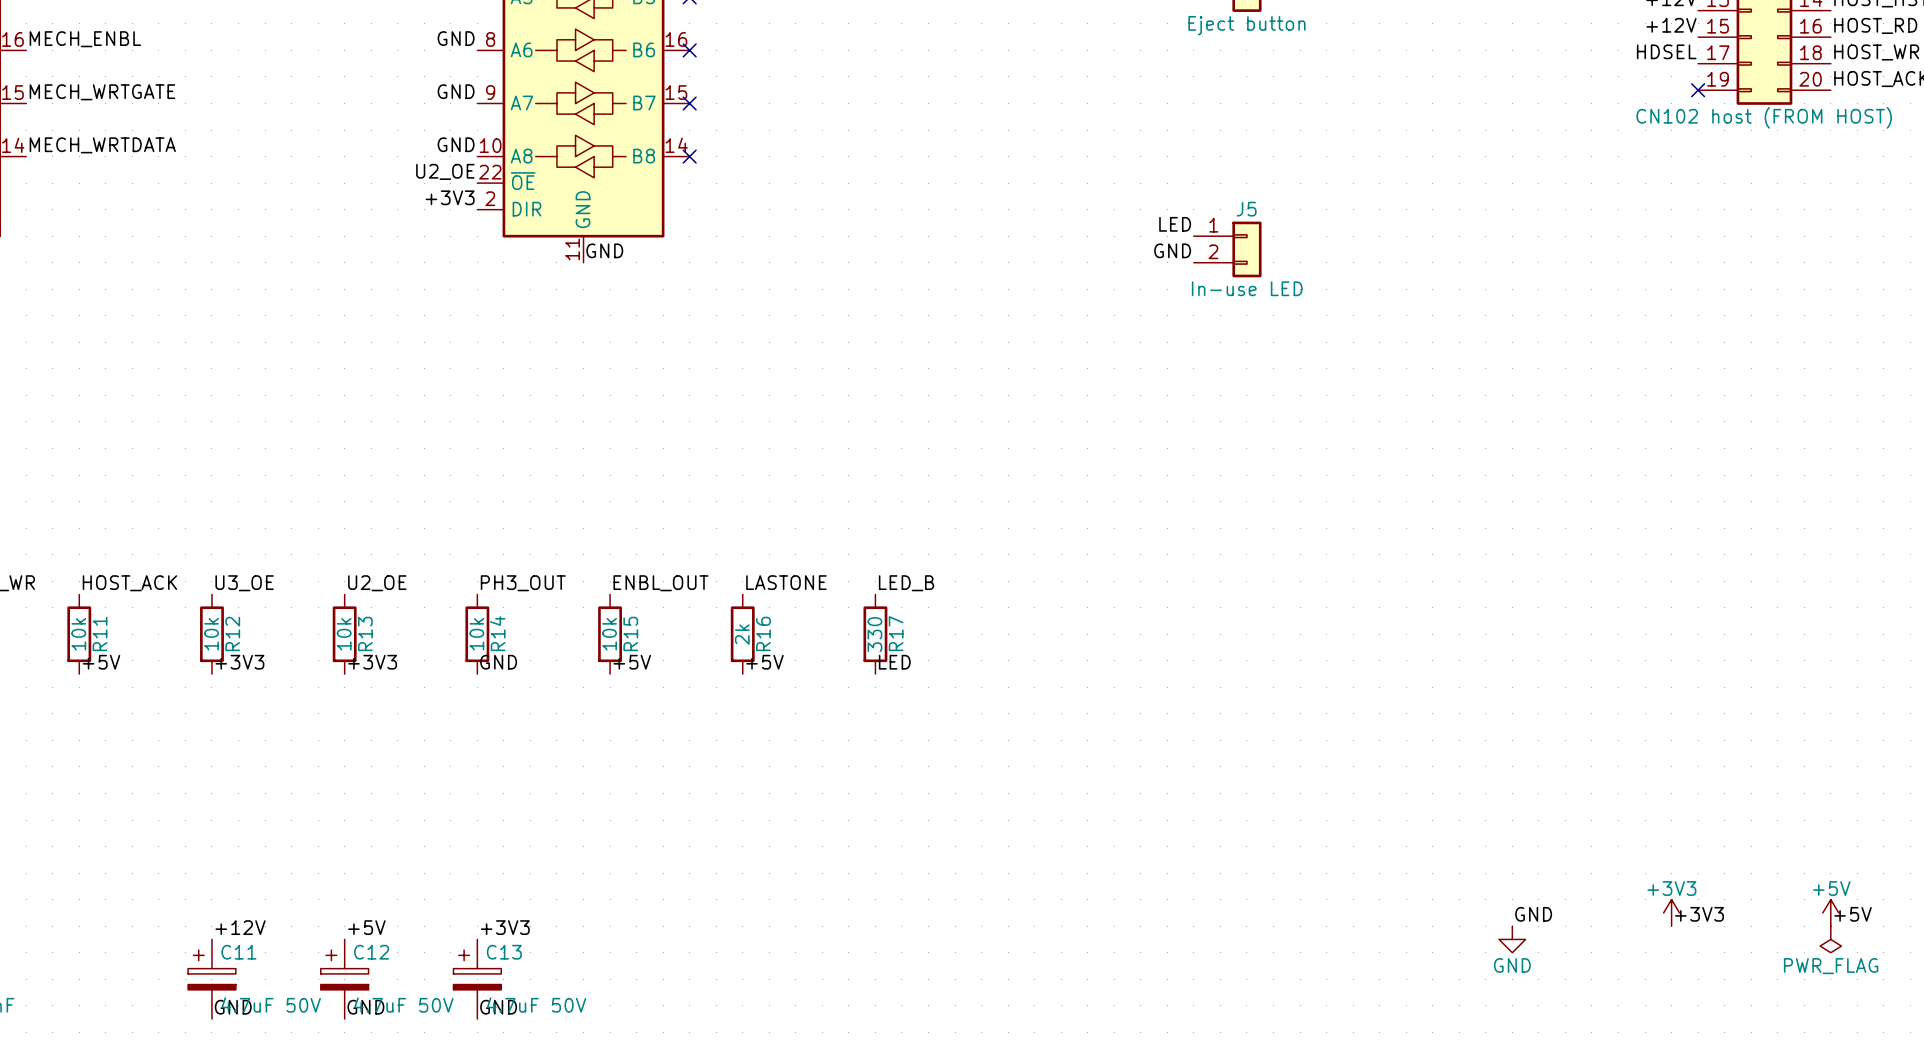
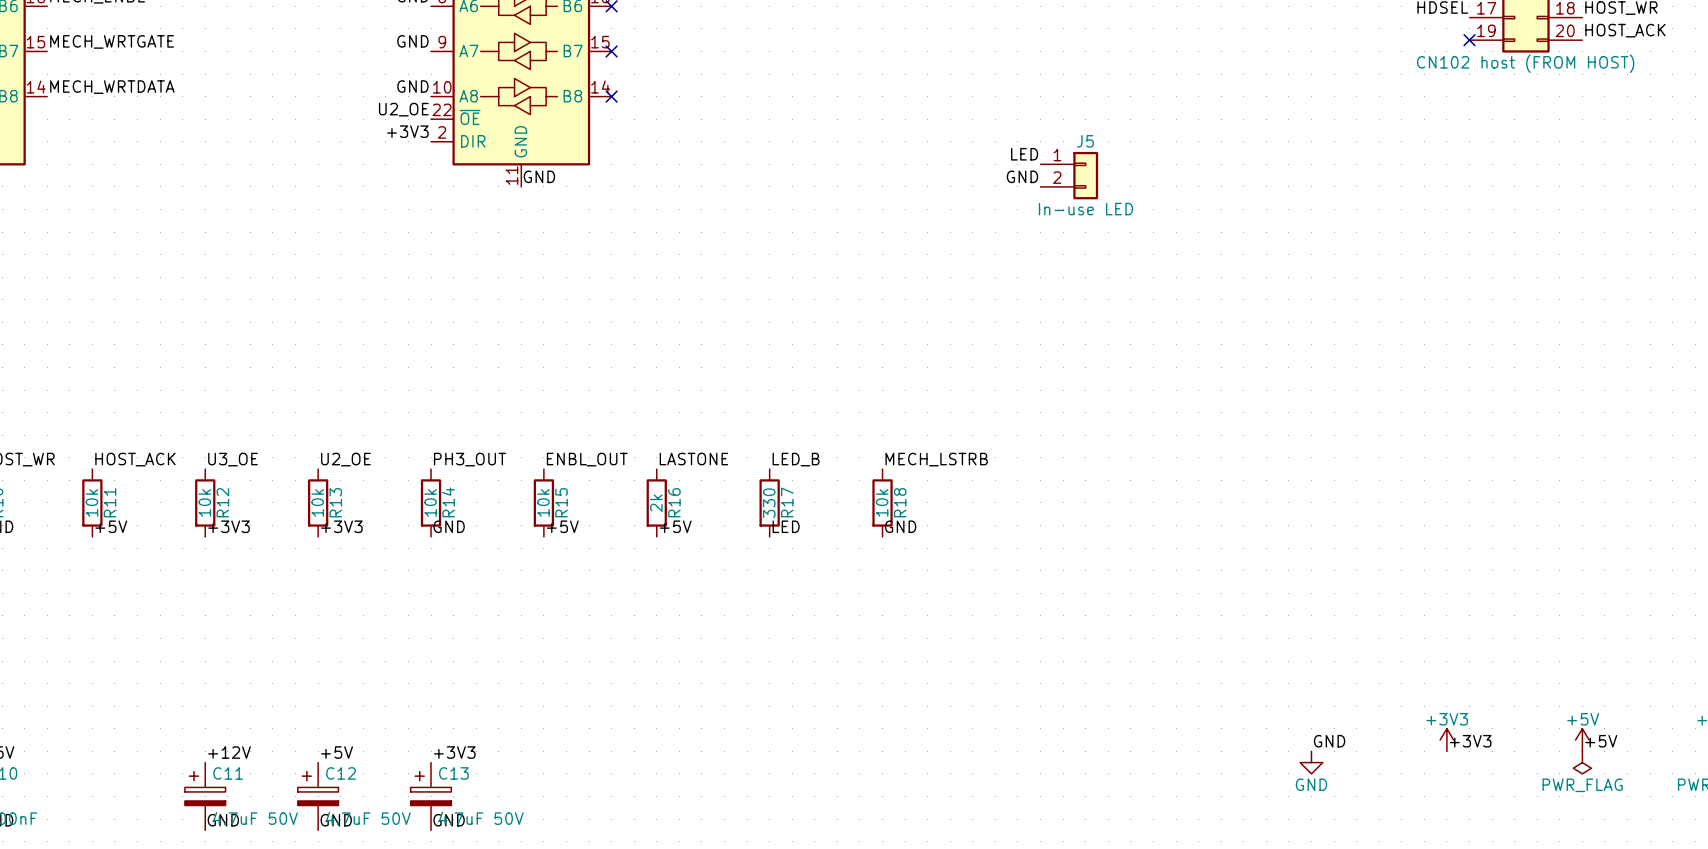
label: none -> MECH_LSTRB (936, 459)
R18: none -> 10k (882, 502)
label: none -> GND (900, 526)

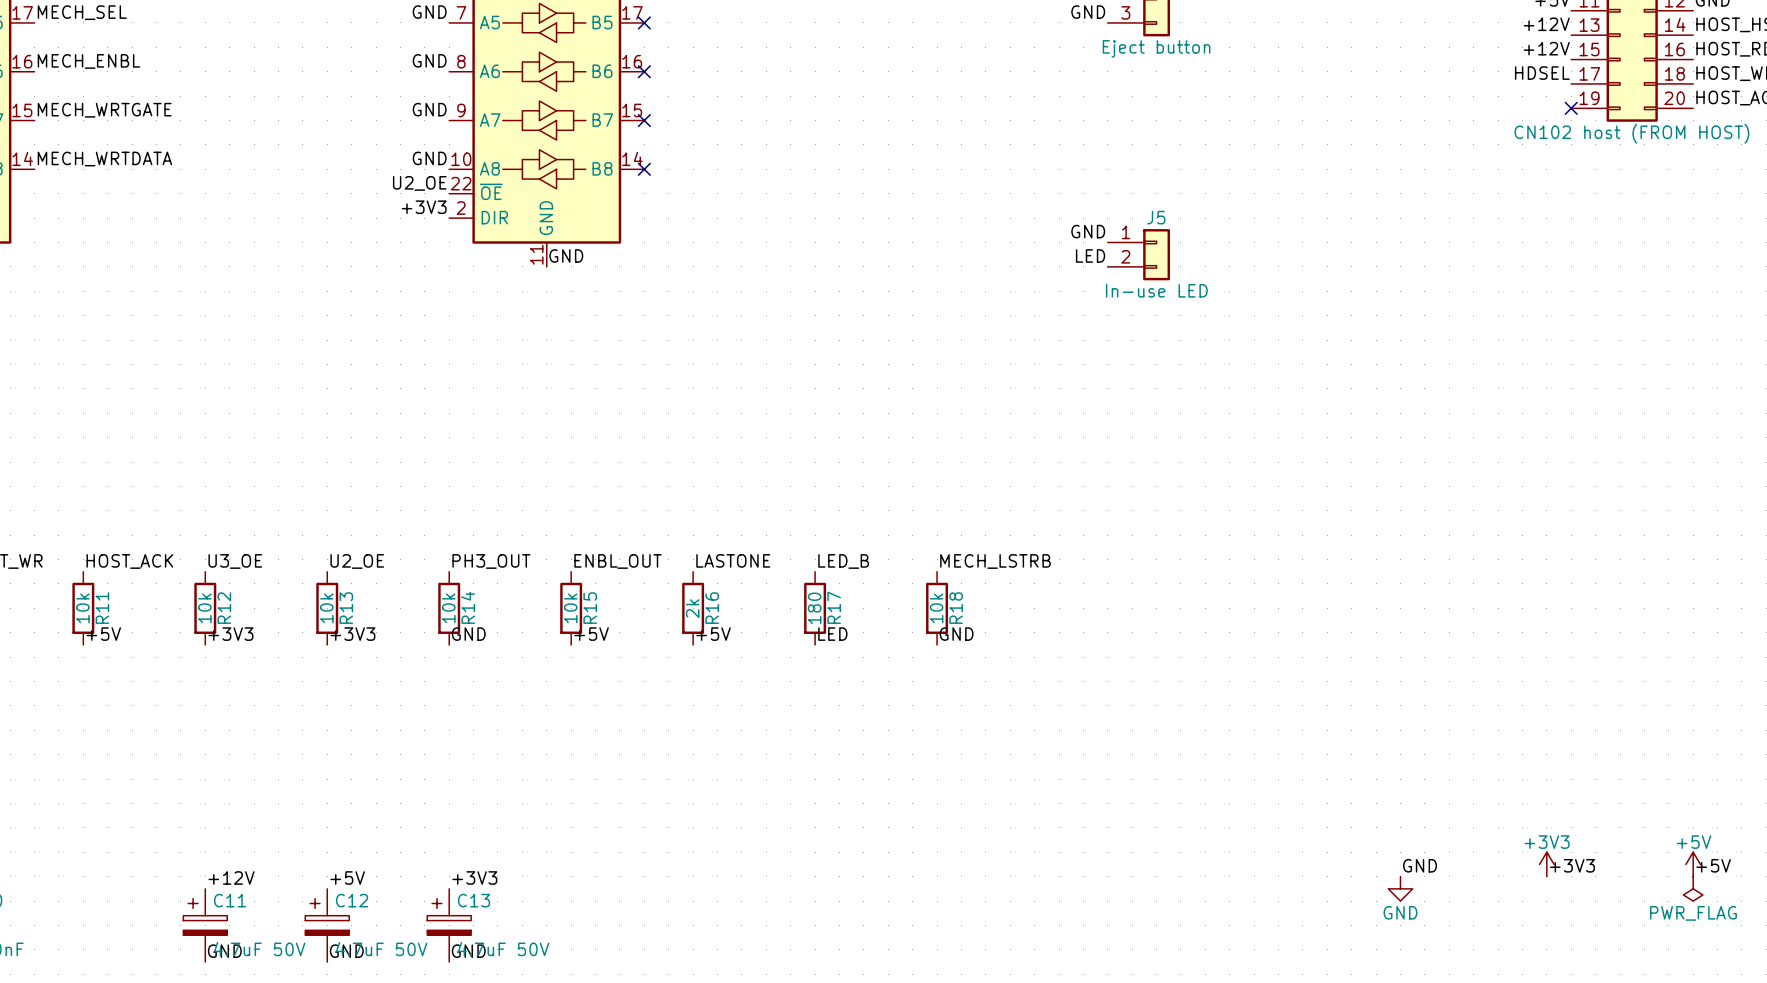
label: LED (1024, 154) -> GND (1088, 231)
label: GND (1022, 176) -> LED (1090, 256)
R17 value: 330 (769, 503) -> 180 (814, 608)

